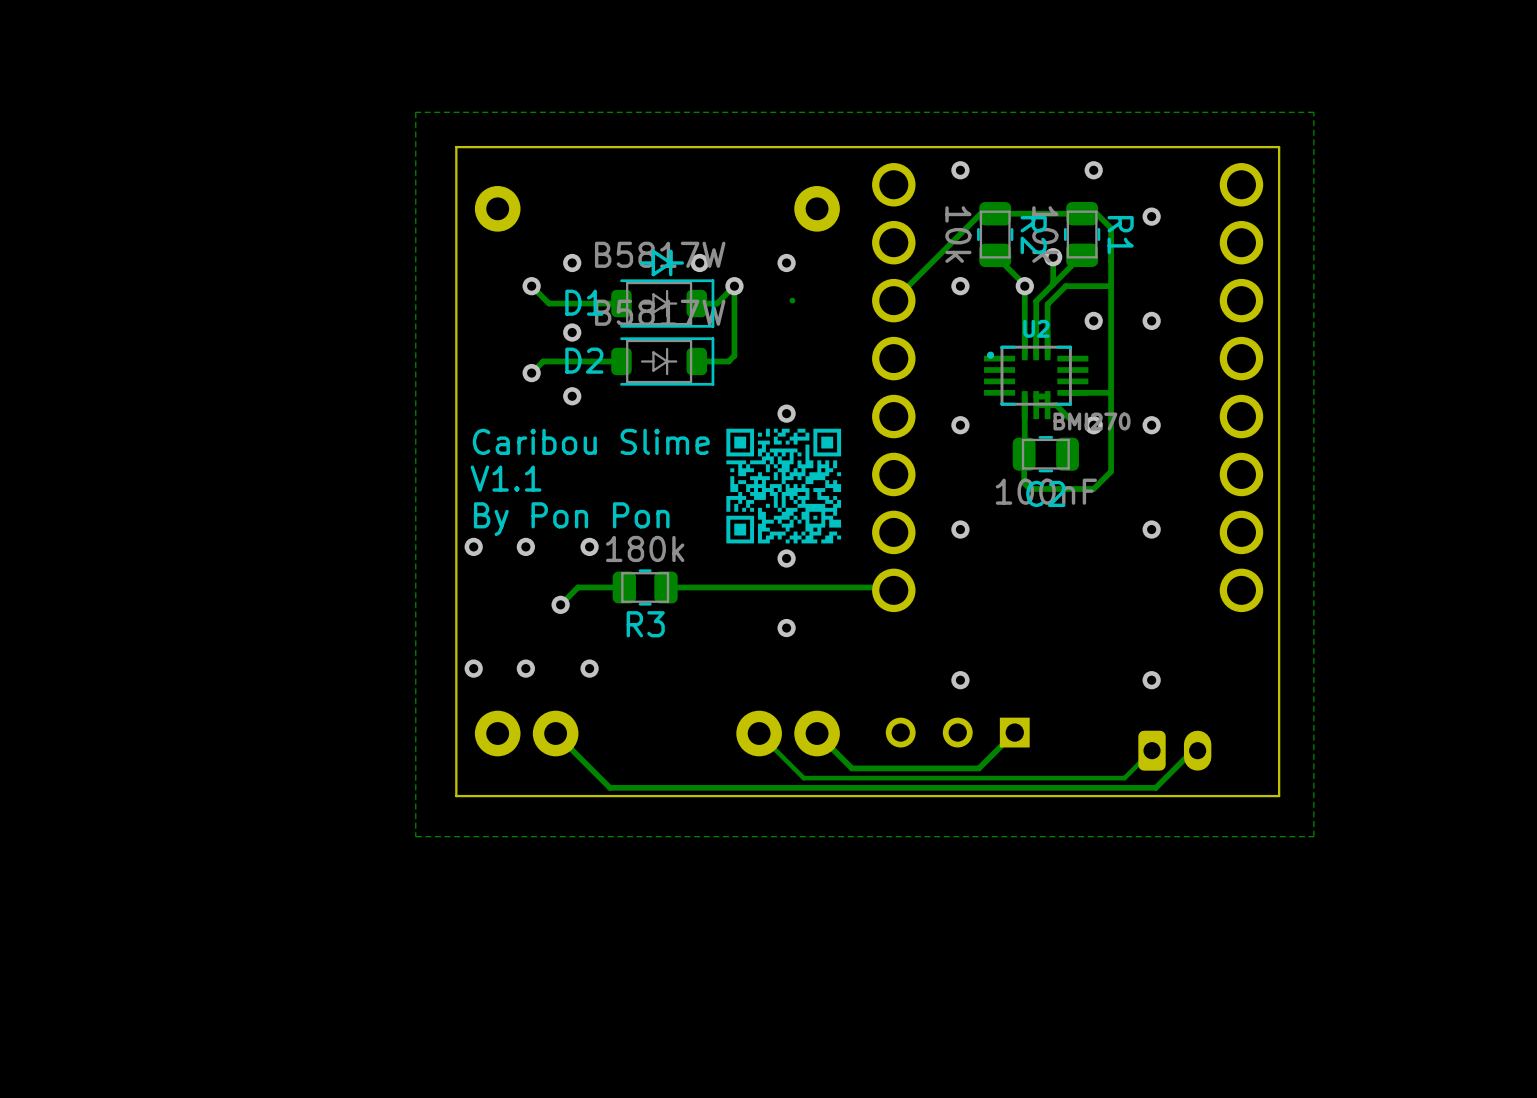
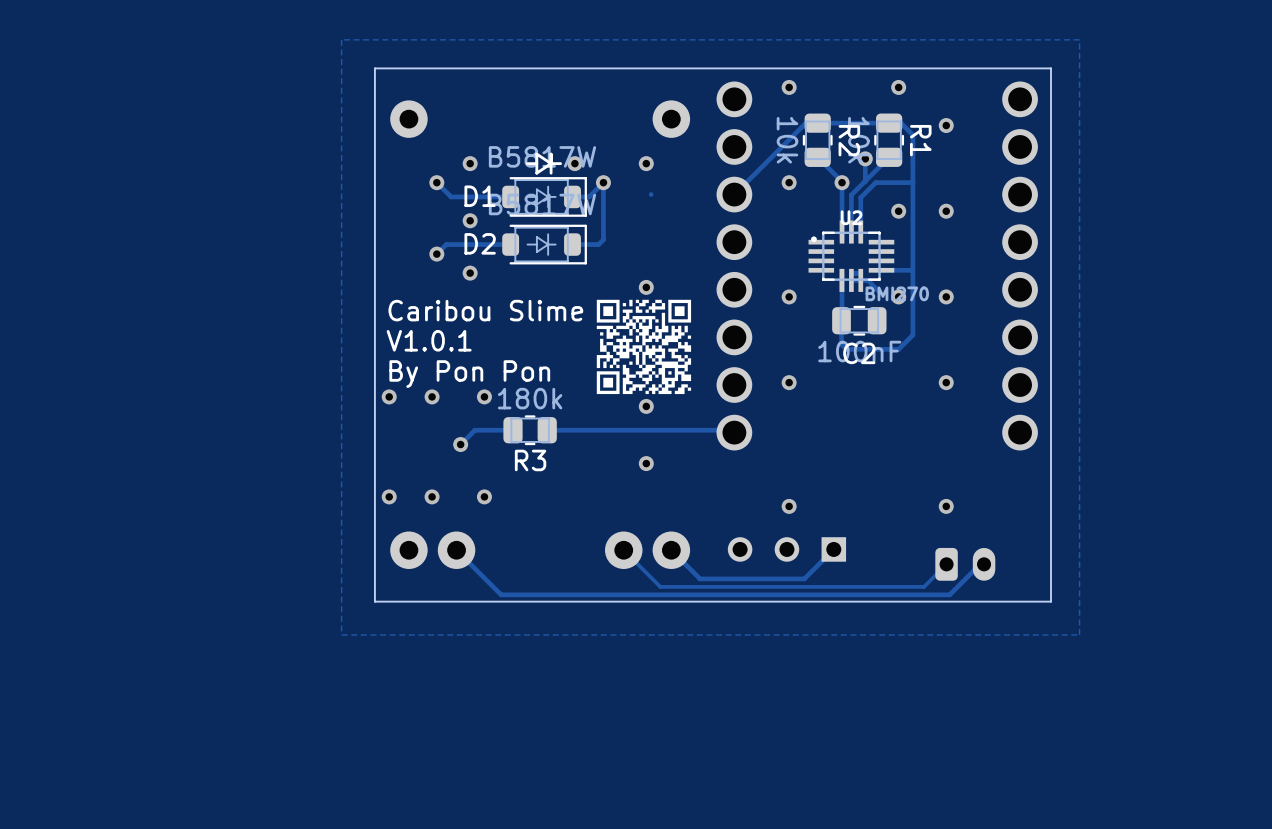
text: V1.1 (506, 478) -> V1.0.1 (429, 340)

